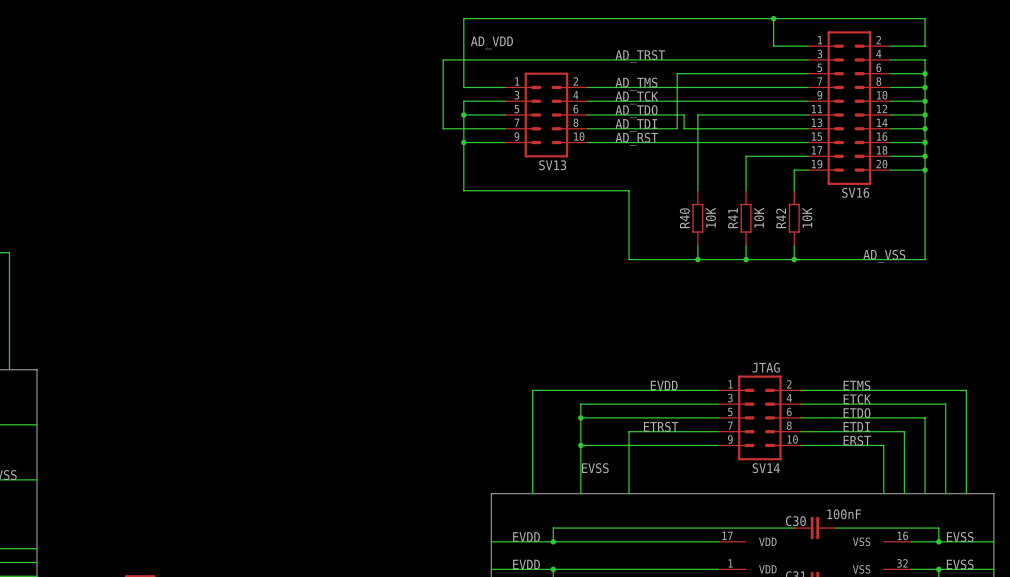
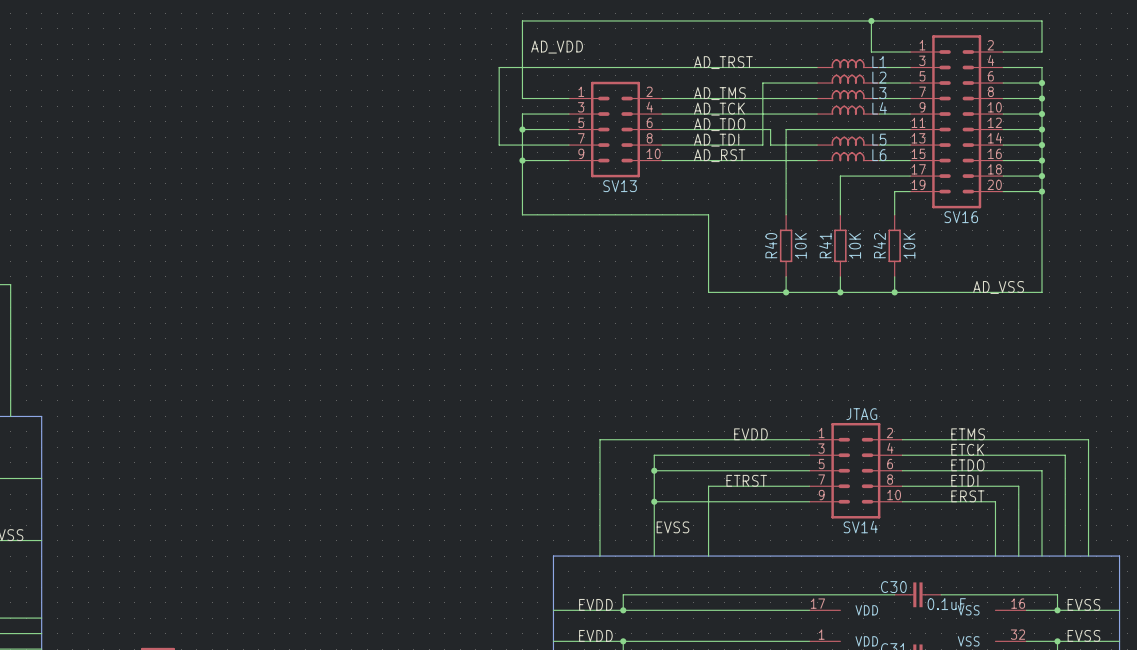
L1: none -> (848, 63)
L2: none -> (848, 79)
L3: none -> (848, 94)
L4: none -> (848, 110)
L5: none -> (848, 141)
L6: none -> (848, 156)
C30 value: 100nF (844, 514) -> 0.1uF (946, 604)

